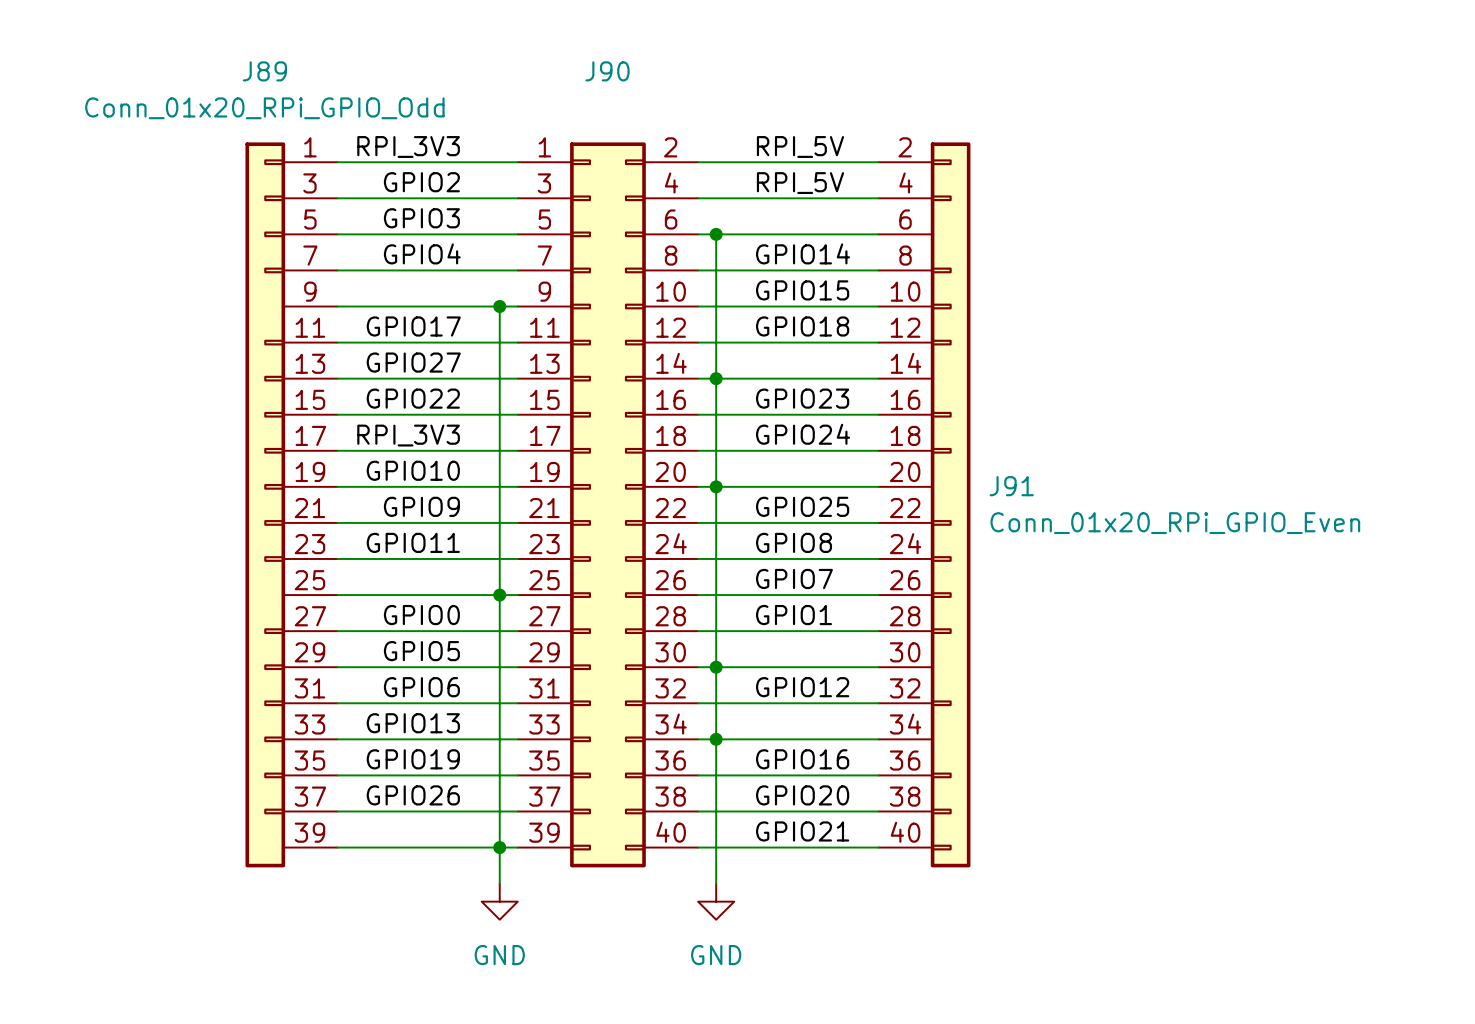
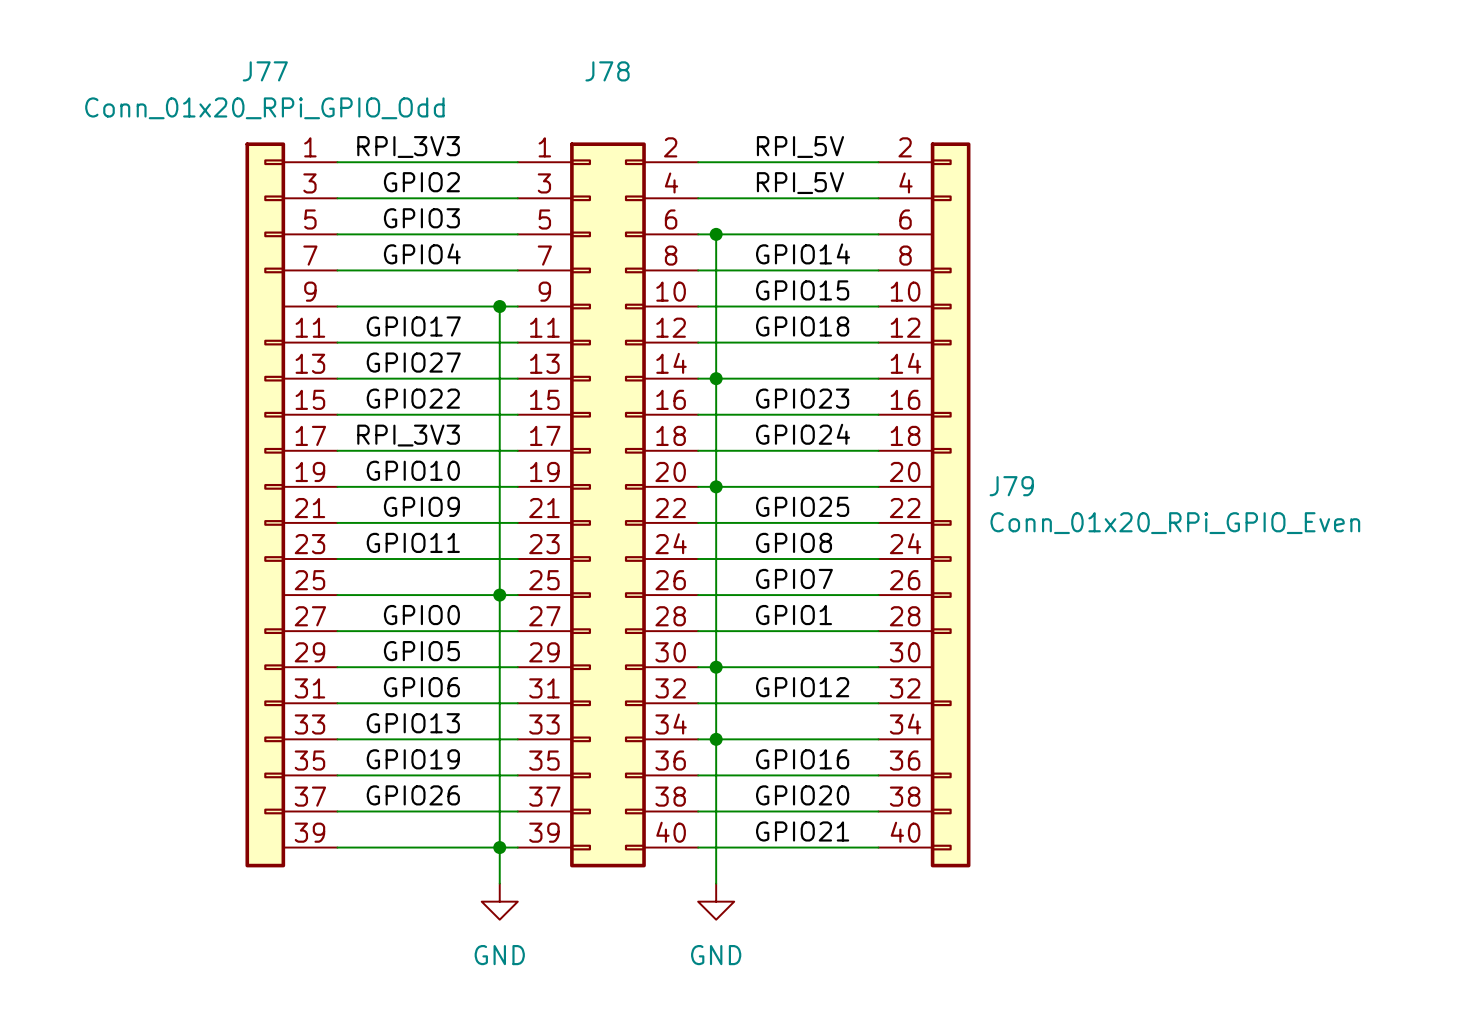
J89 name: J89 (264, 71) -> J77 (265, 71)
J90 name: J90 (607, 71) -> J78 (607, 71)
J91 name: J91 (1011, 486) -> J79 (1011, 486)

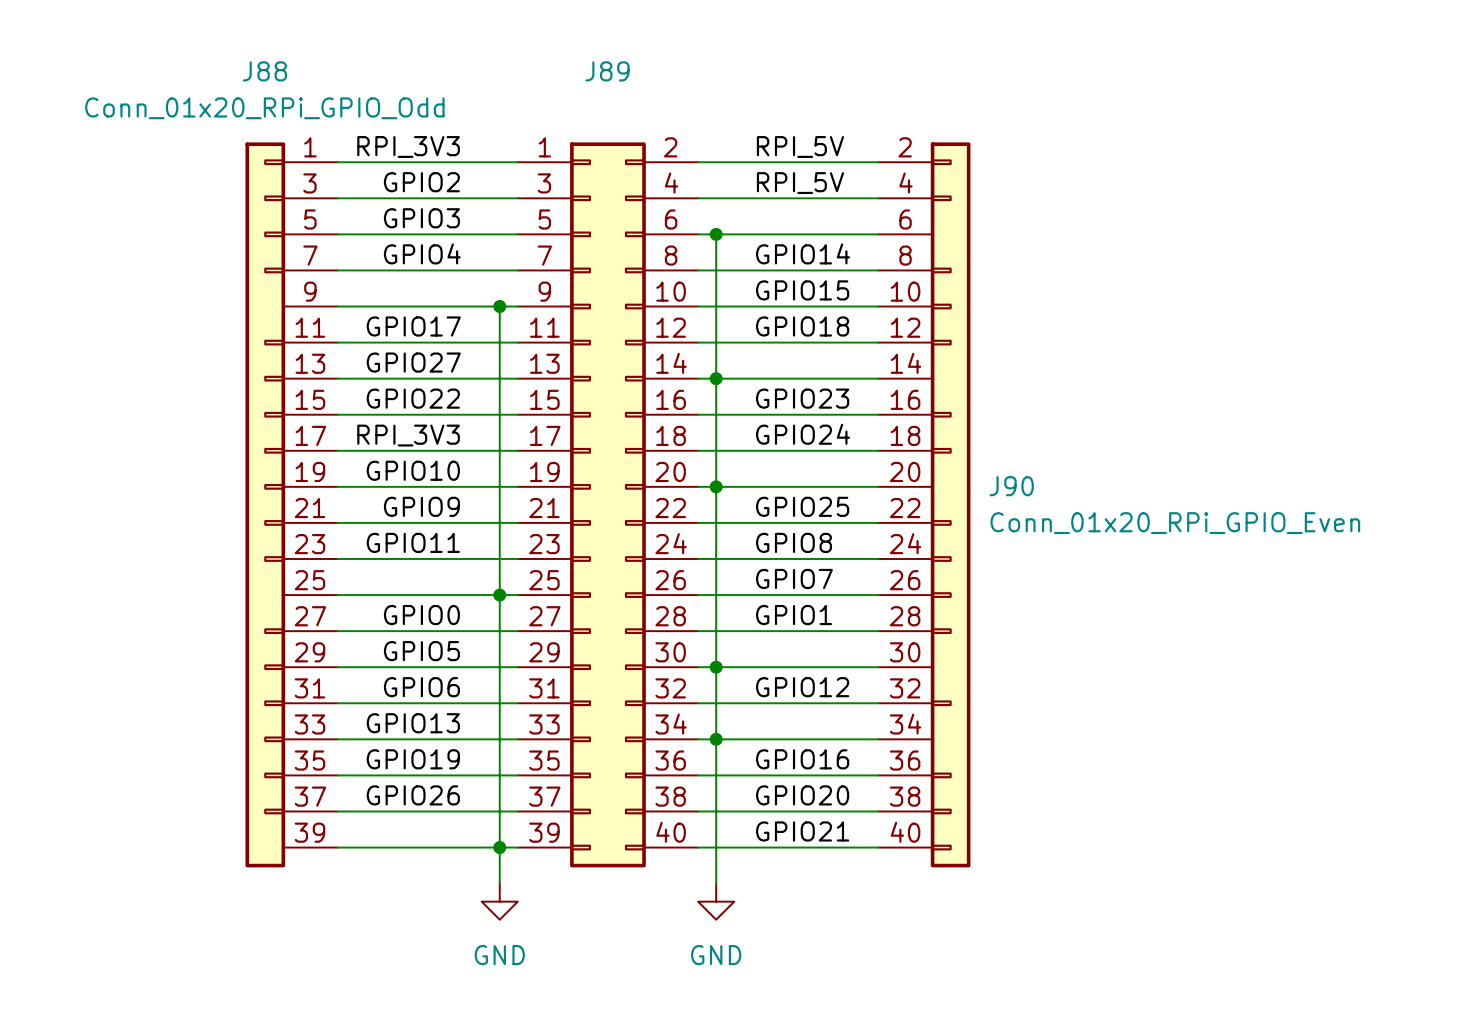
J77 name: J77 (265, 71) -> J88 (264, 71)
J78 name: J78 (607, 71) -> J89 (607, 71)
J79 name: J79 (1011, 486) -> J90 (1011, 486)

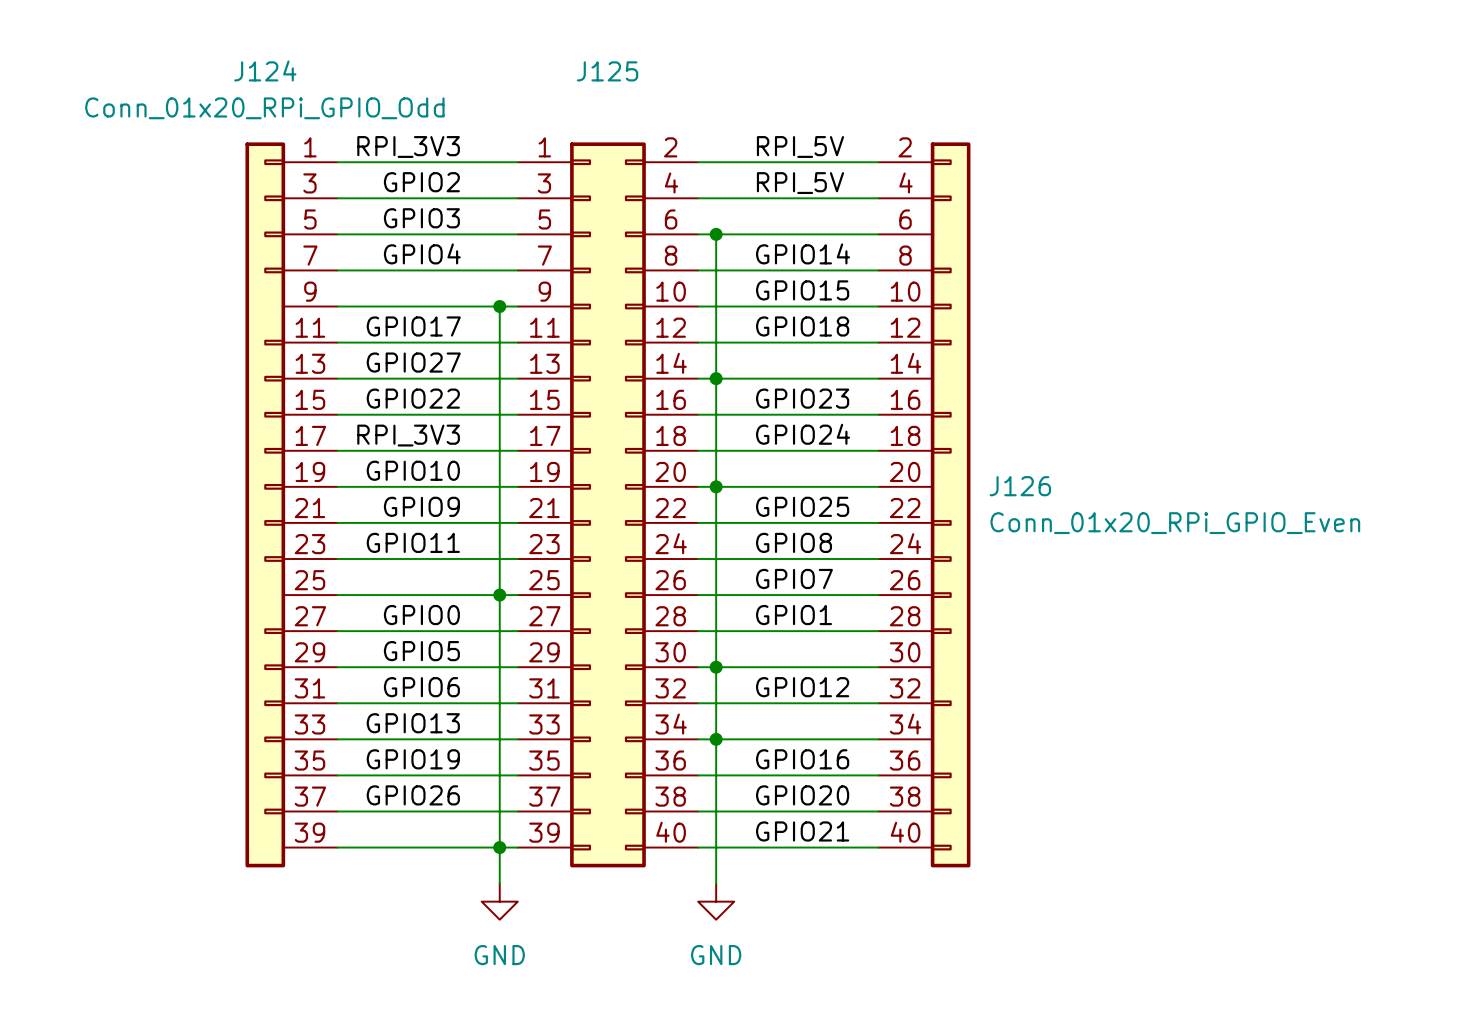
J88 name: J88 (264, 71) -> J124 (265, 70)
J89 name: J89 (607, 71) -> J125 (607, 71)
J90 name: J90 (1011, 486) -> J126 (1020, 486)

